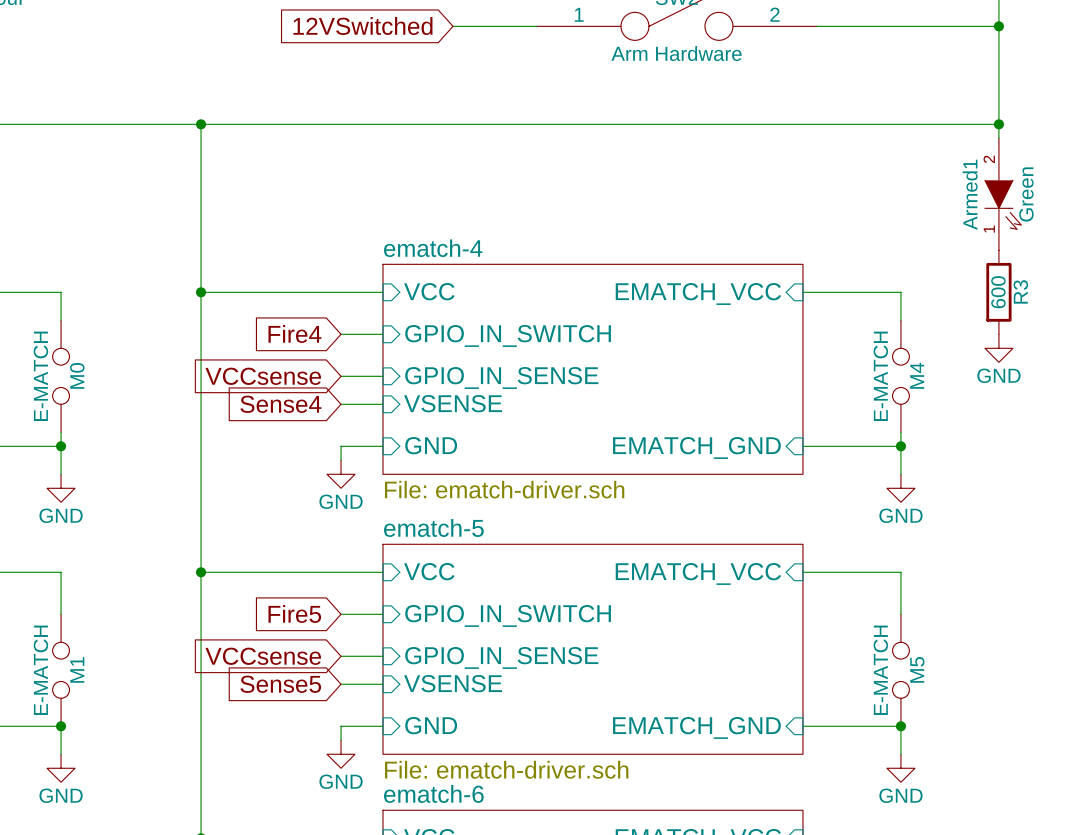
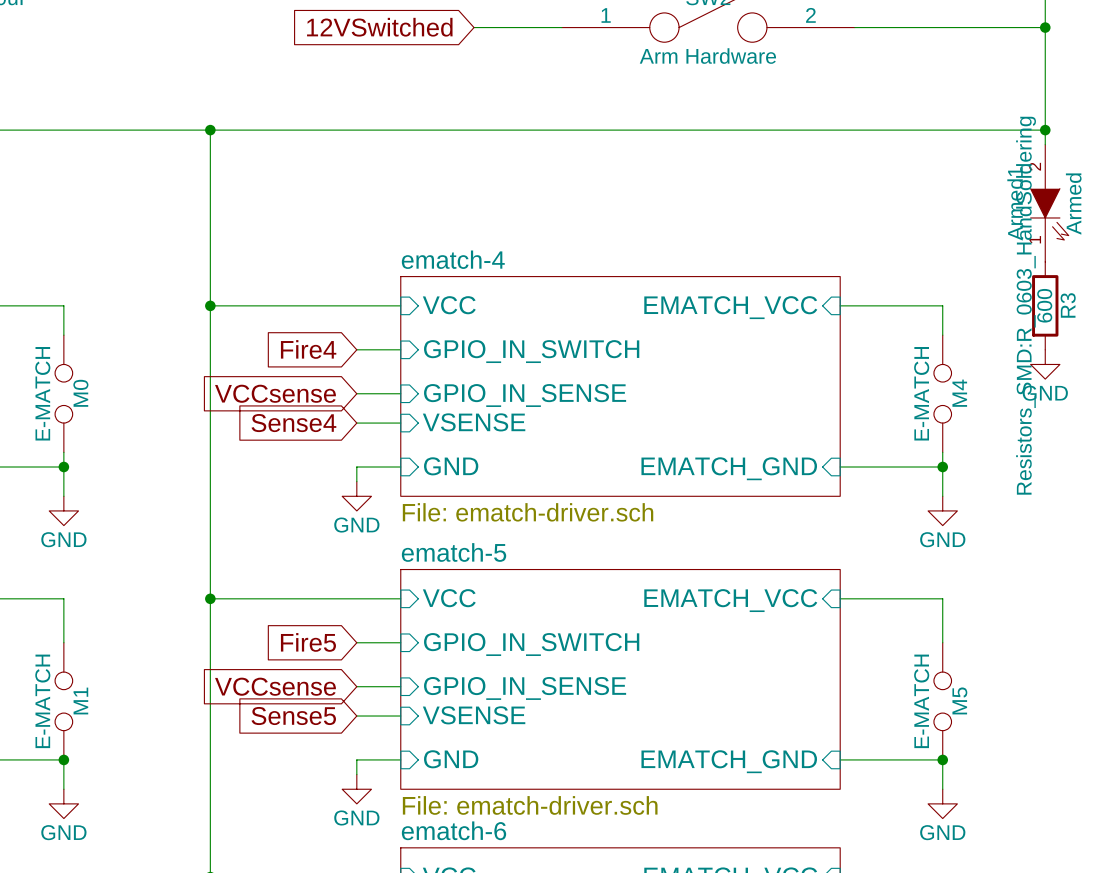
Armed1 value: Green (1026, 194) -> Armed (1073, 204)
R3 text: none -> Resistors_SMD:R_0603_HandSoldering (1026, 305)

